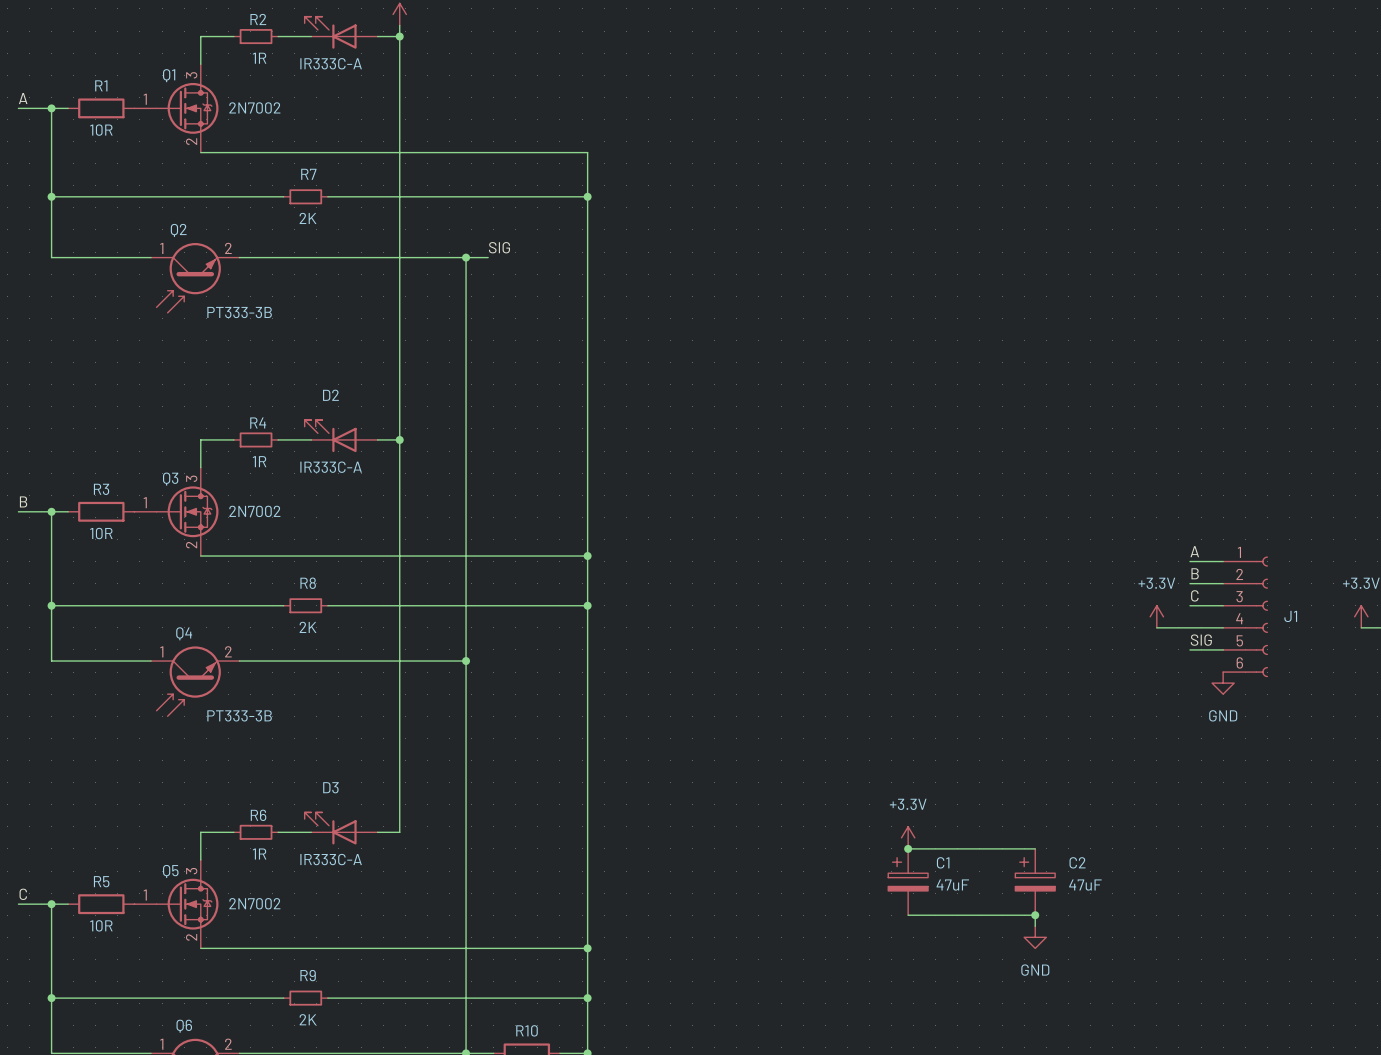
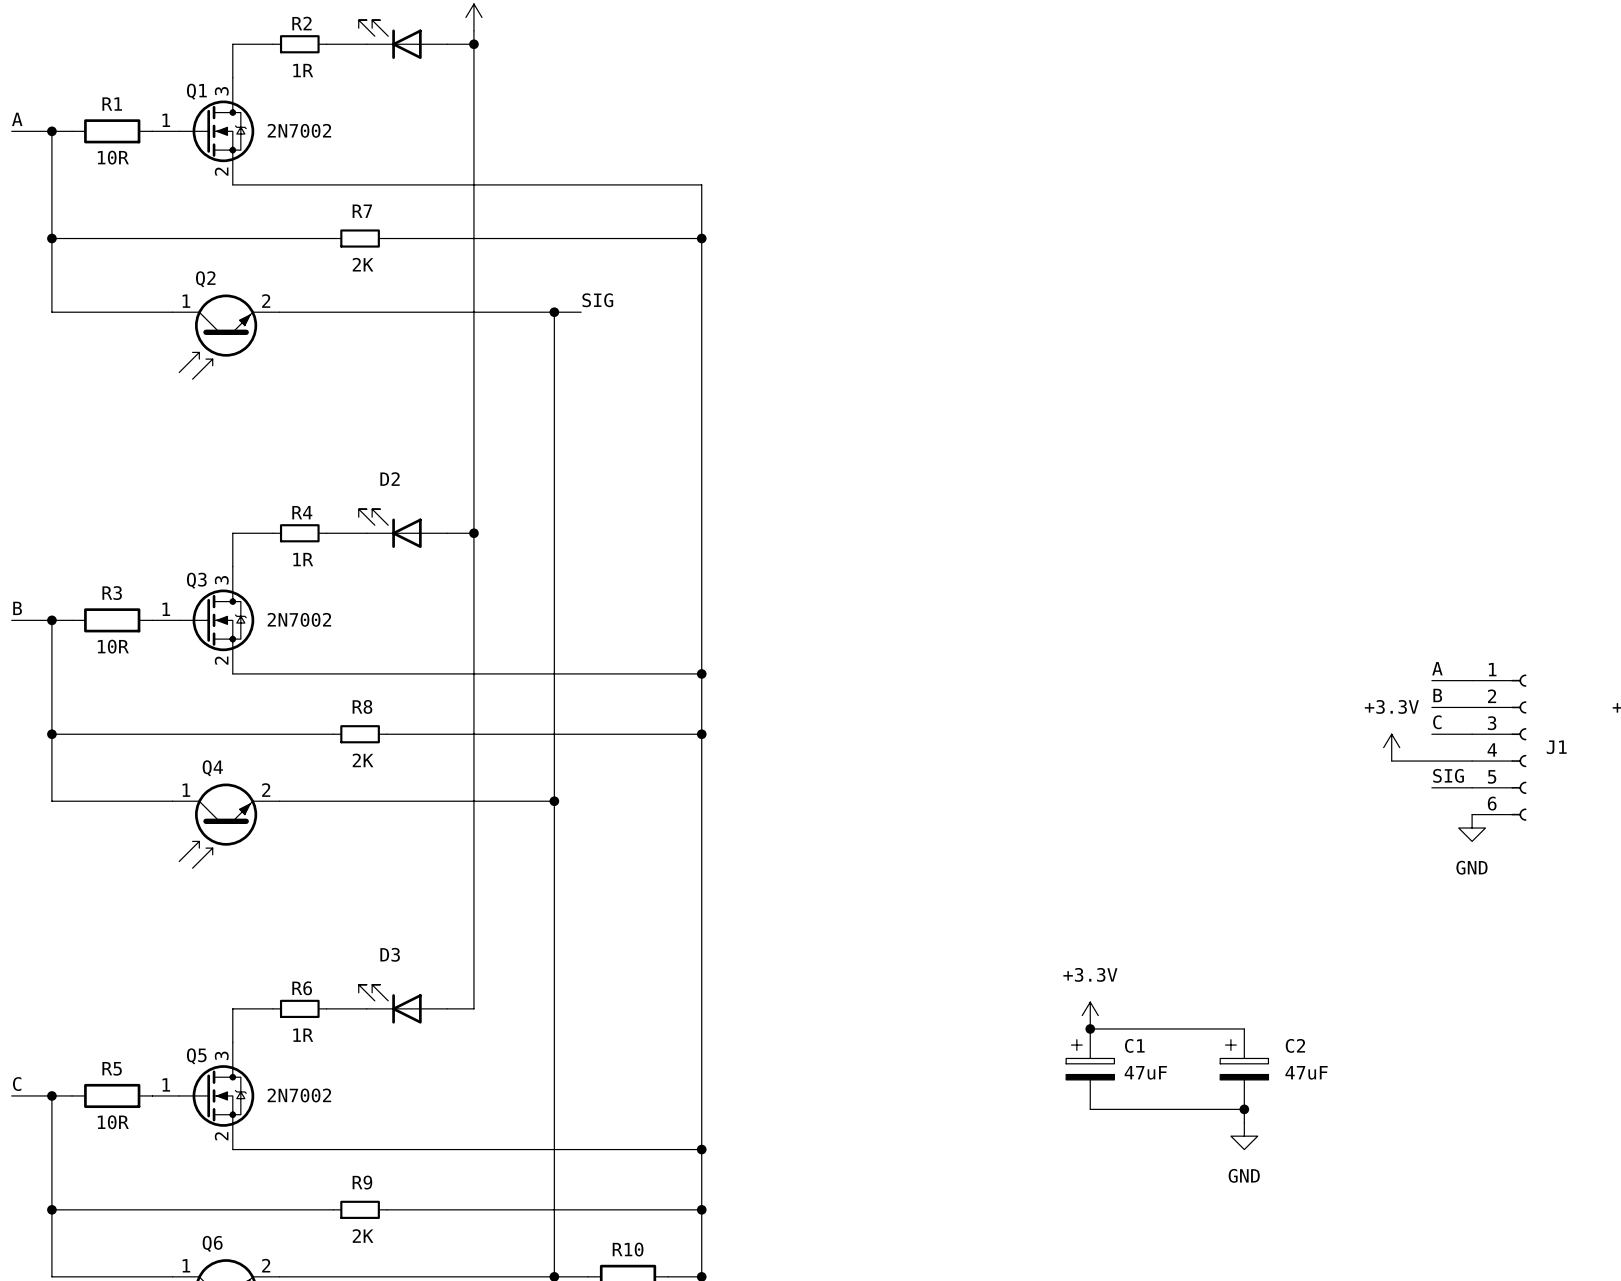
part value: IR333C-A (331, 63) -> none
Q2 value: PT333-3B (239, 312) -> none
D2 value: IR333C-A (331, 467) -> none
Q4 value: PT333-3B (239, 715) -> none
D3 value: IR333C-A (331, 859) -> none

